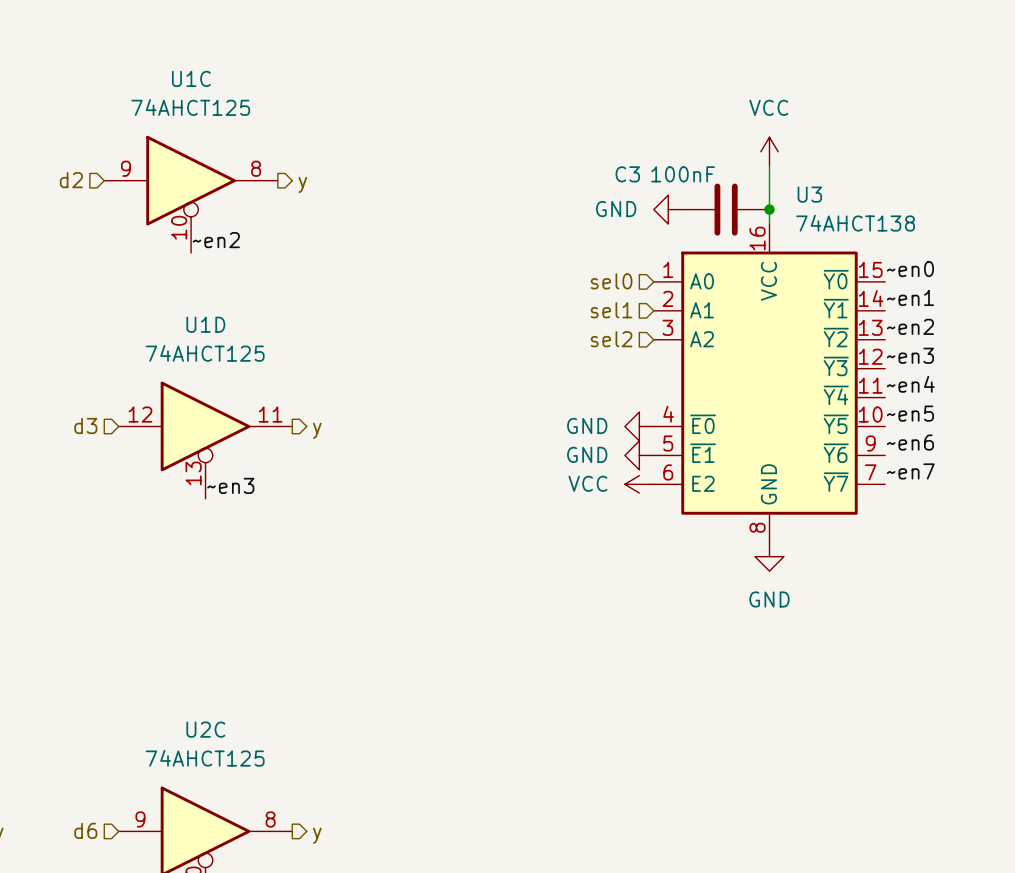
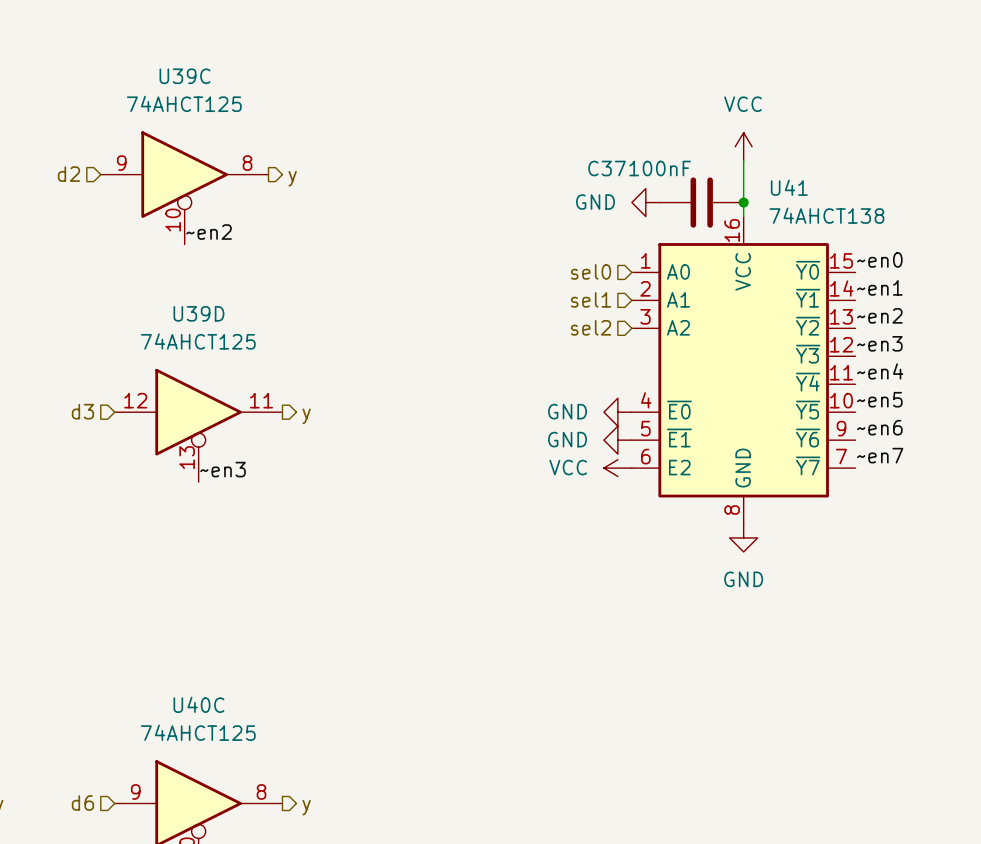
U1C name: U1C (191, 78) -> U39C (184, 76)
C3 name: C3 (627, 174) -> C37 (607, 168)
U3 name: U3 (809, 194) -> U41 (789, 187)
U1D name: U1D (205, 324) -> U39D (198, 313)
U2C name: U2C (205, 729) -> U40C (198, 704)

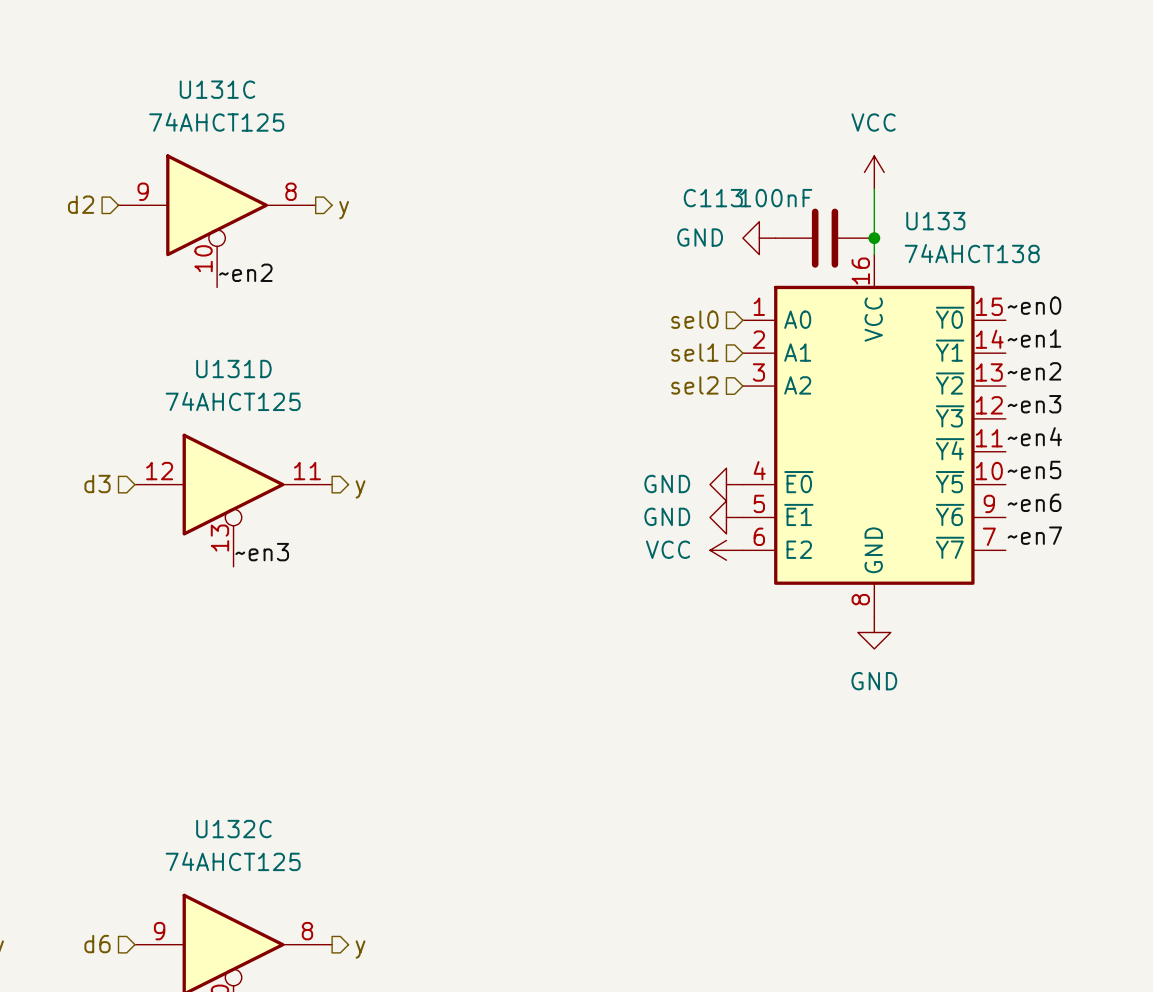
U39C name: U39C (184, 76) -> U131C (217, 89)
C37 name: C37 (607, 168) -> C113 (713, 198)
U41 name: U41 (789, 187) -> U133 (935, 221)
U39D name: U39D (198, 313) -> U131D (233, 368)
U40C name: U40C (198, 704) -> U132C (233, 829)

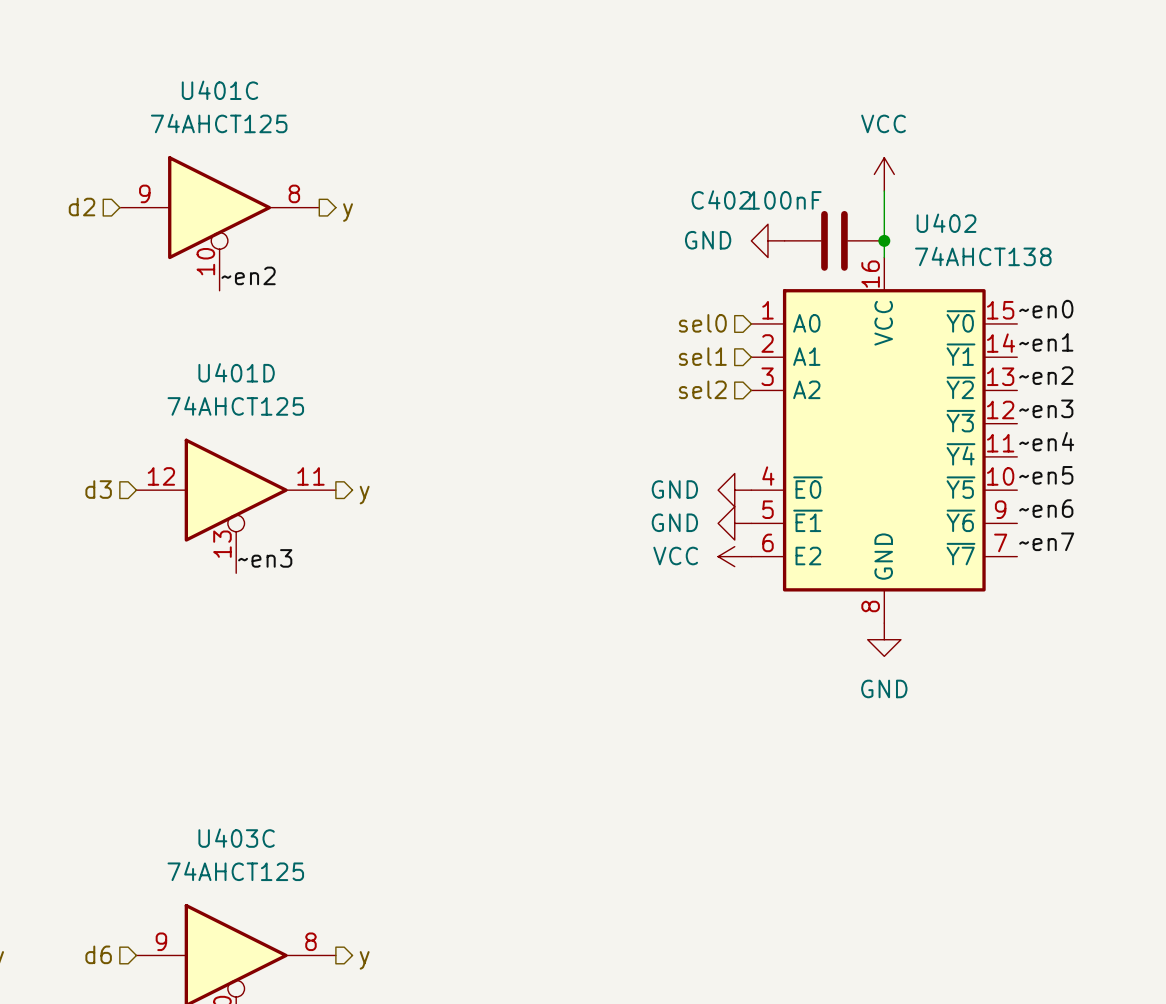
U131C name: U131C (217, 89) -> U401C (219, 90)
C113 name: C113 (713, 198) -> C402 (721, 199)
U133 name: U133 (935, 221) -> U402 (946, 223)
U131D name: U131D (233, 368) -> U401D (236, 372)
U132C name: U132C (233, 829) -> U403C (236, 838)

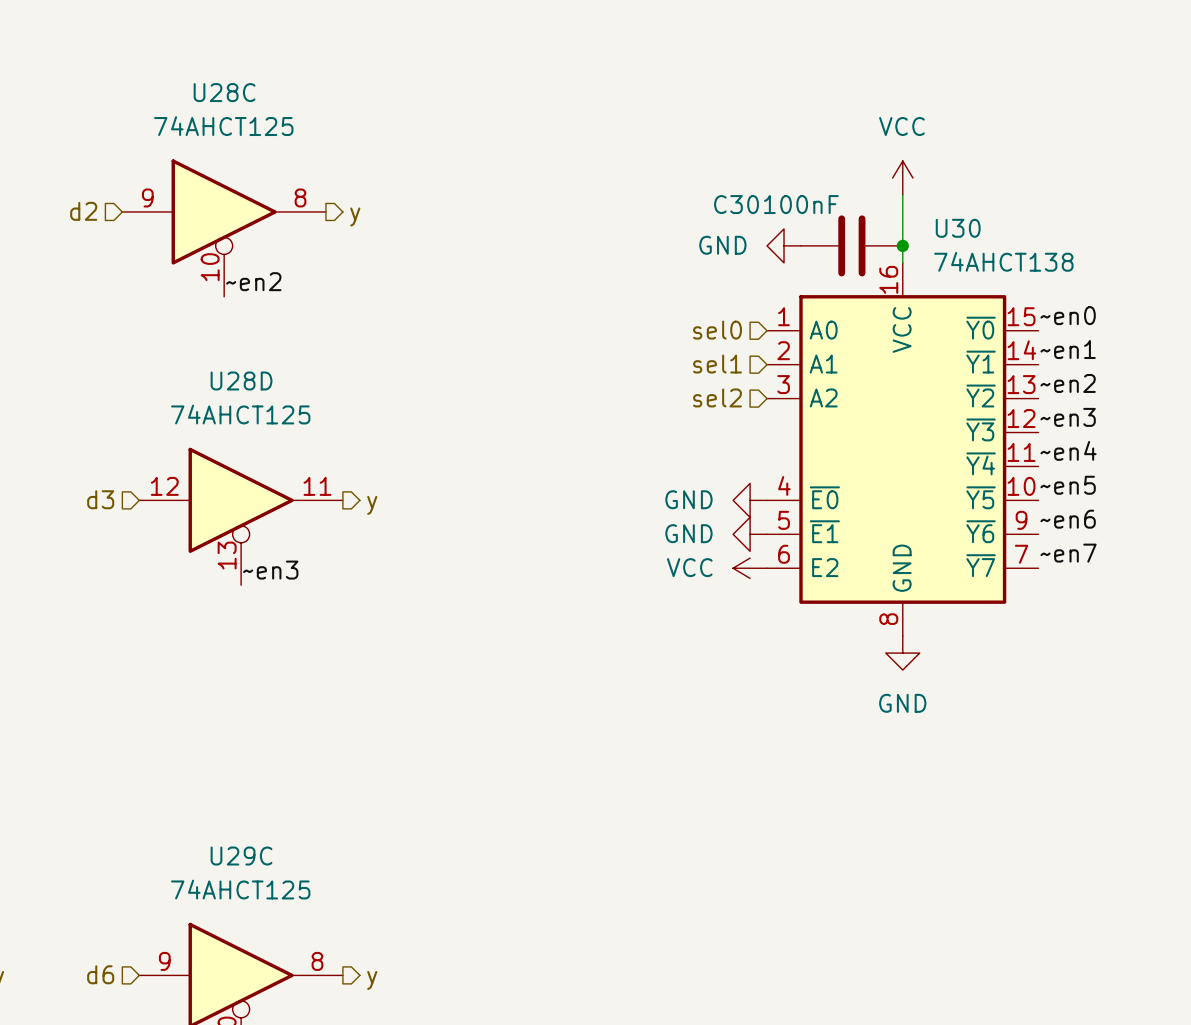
U401C name: U401C (219, 90) -> U28C (224, 92)
C402 name: C402 (721, 199) -> C30 (736, 204)
U402 name: U402 (946, 223) -> U30 (958, 228)
U401D name: U401D (236, 372) -> U28D (241, 380)
U403C name: U403C (236, 838) -> U29C (241, 856)

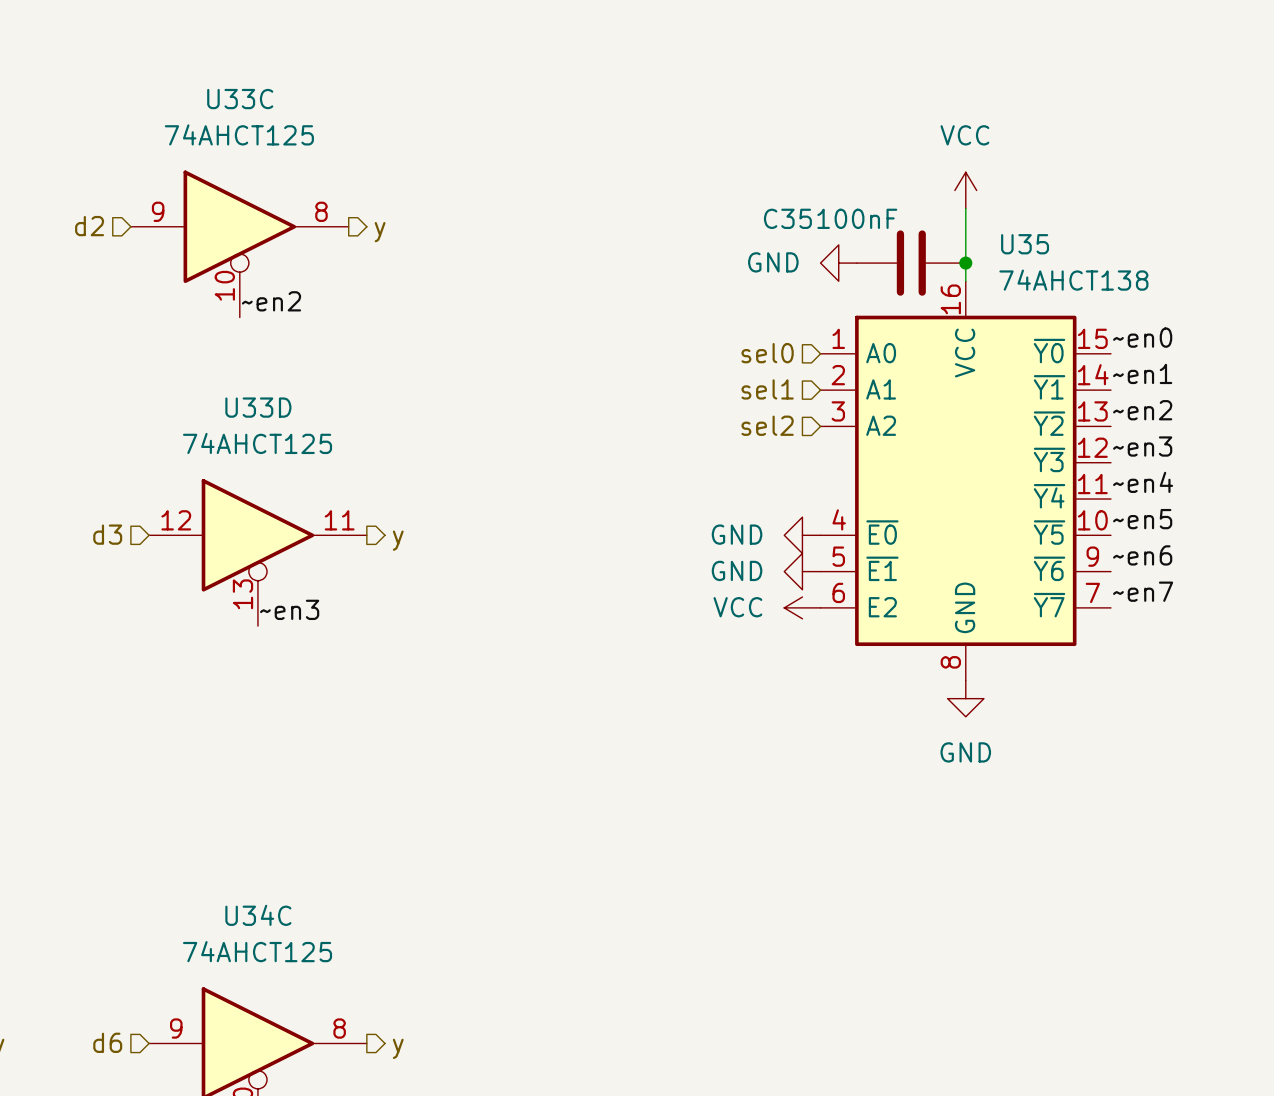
U28C name: U28C (224, 92) -> U33C (240, 99)
C30 name: C30 (736, 204) -> C35 (787, 218)
U30 name: U30 (958, 228) -> U35 (1025, 244)
U28D name: U28D (241, 380) -> U33D (258, 407)
U29C name: U29C (241, 856) -> U34C (258, 915)

